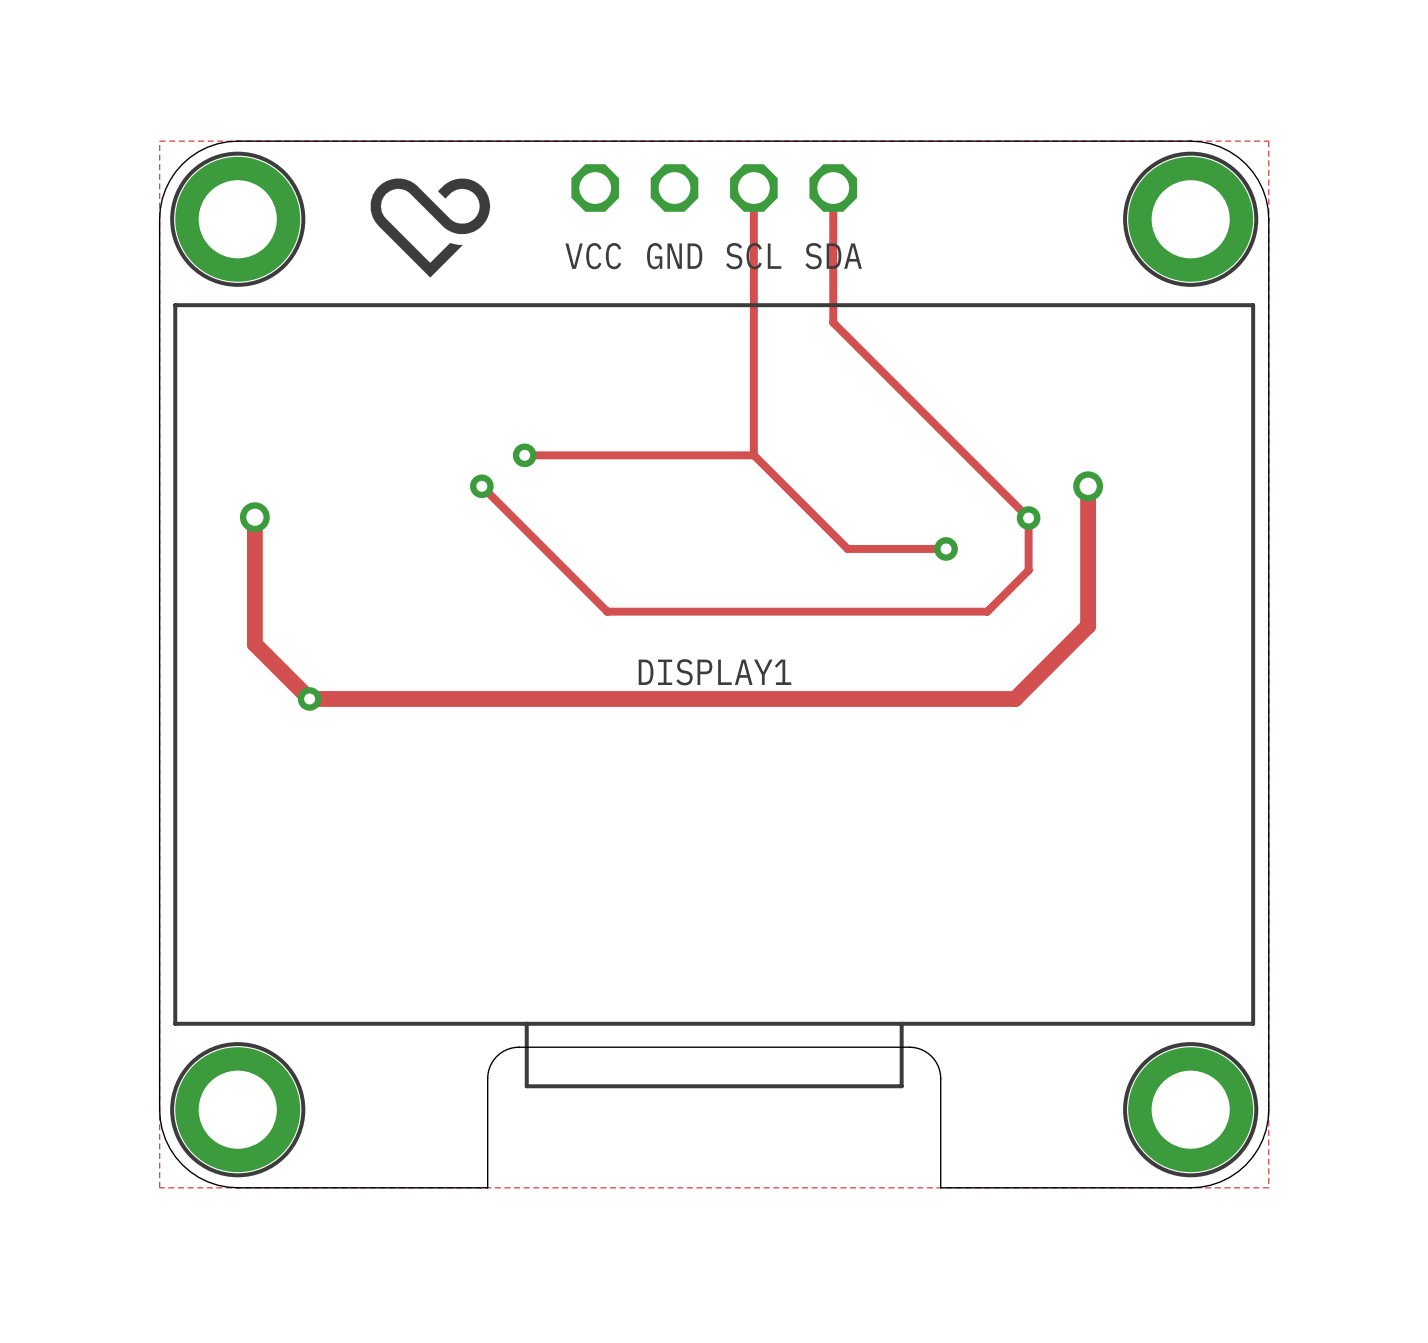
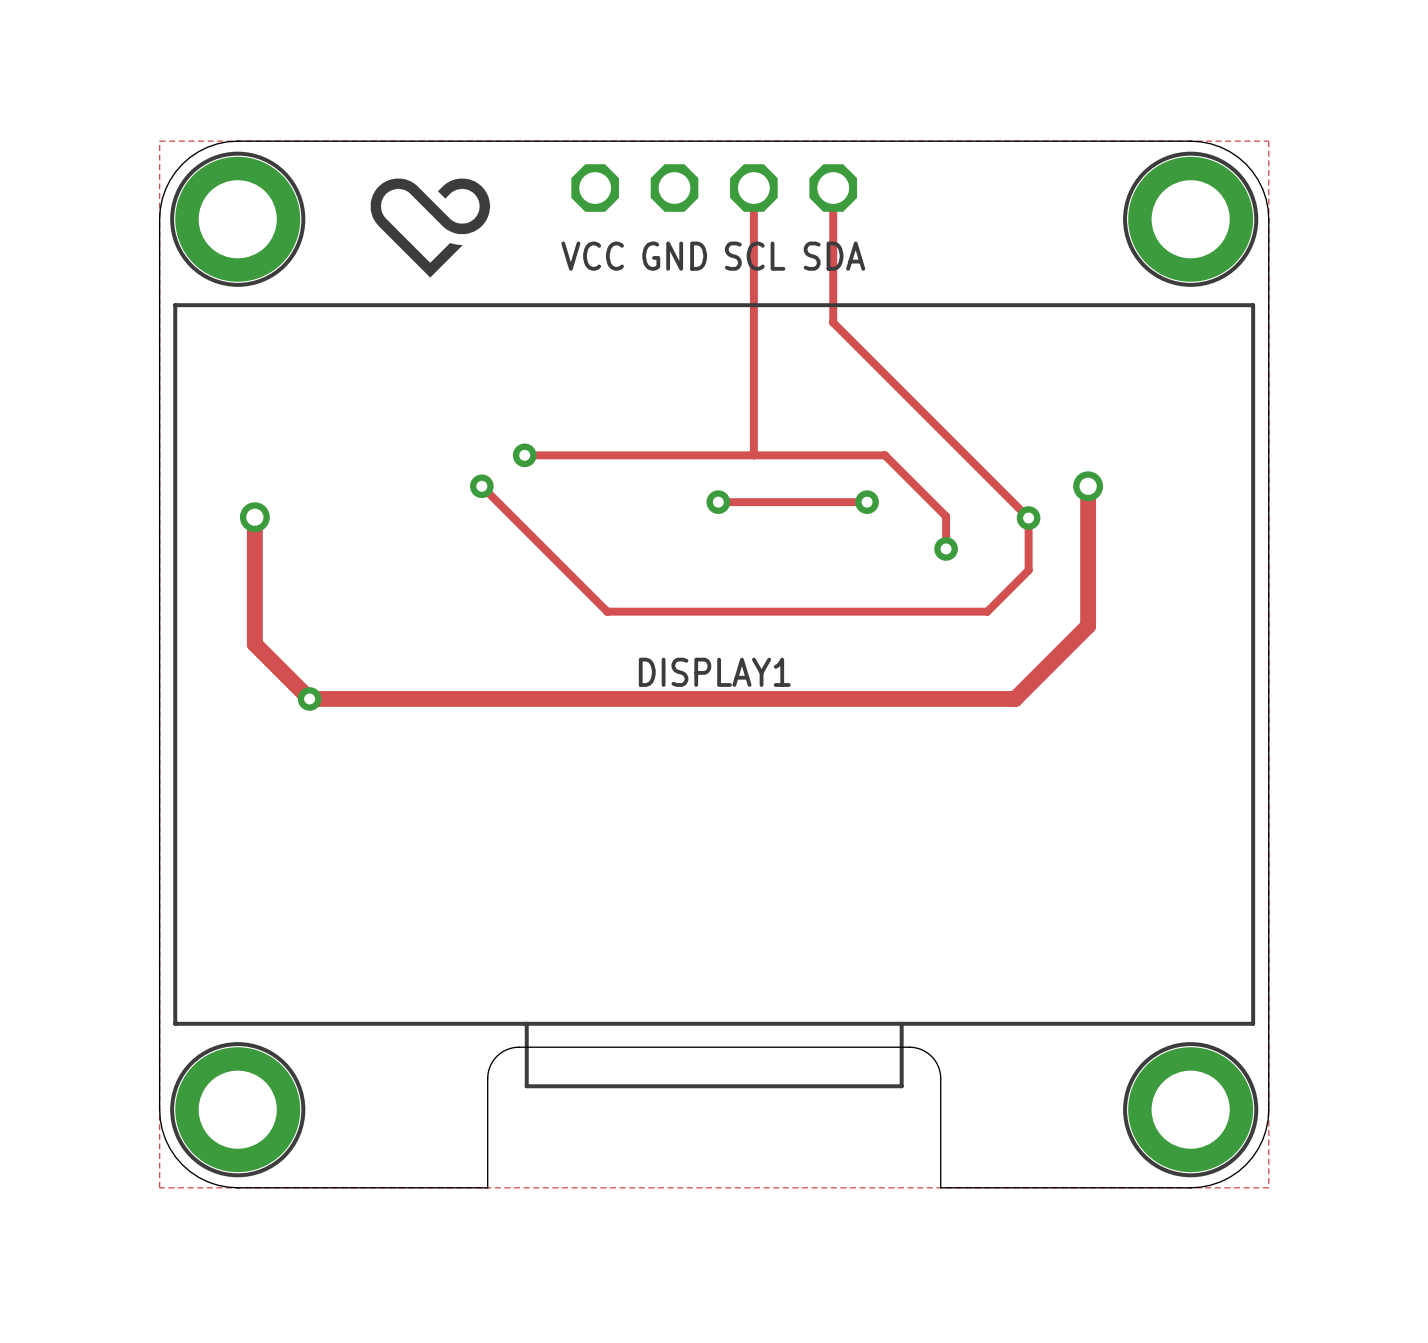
track: (754, 455) (847, 548) (946, 548) -> (754, 455) (884, 455) (946, 516) (946, 548)
track: none -> (718, 502) (867, 502)
via: none -> (718, 502)
via: none -> (867, 502)

